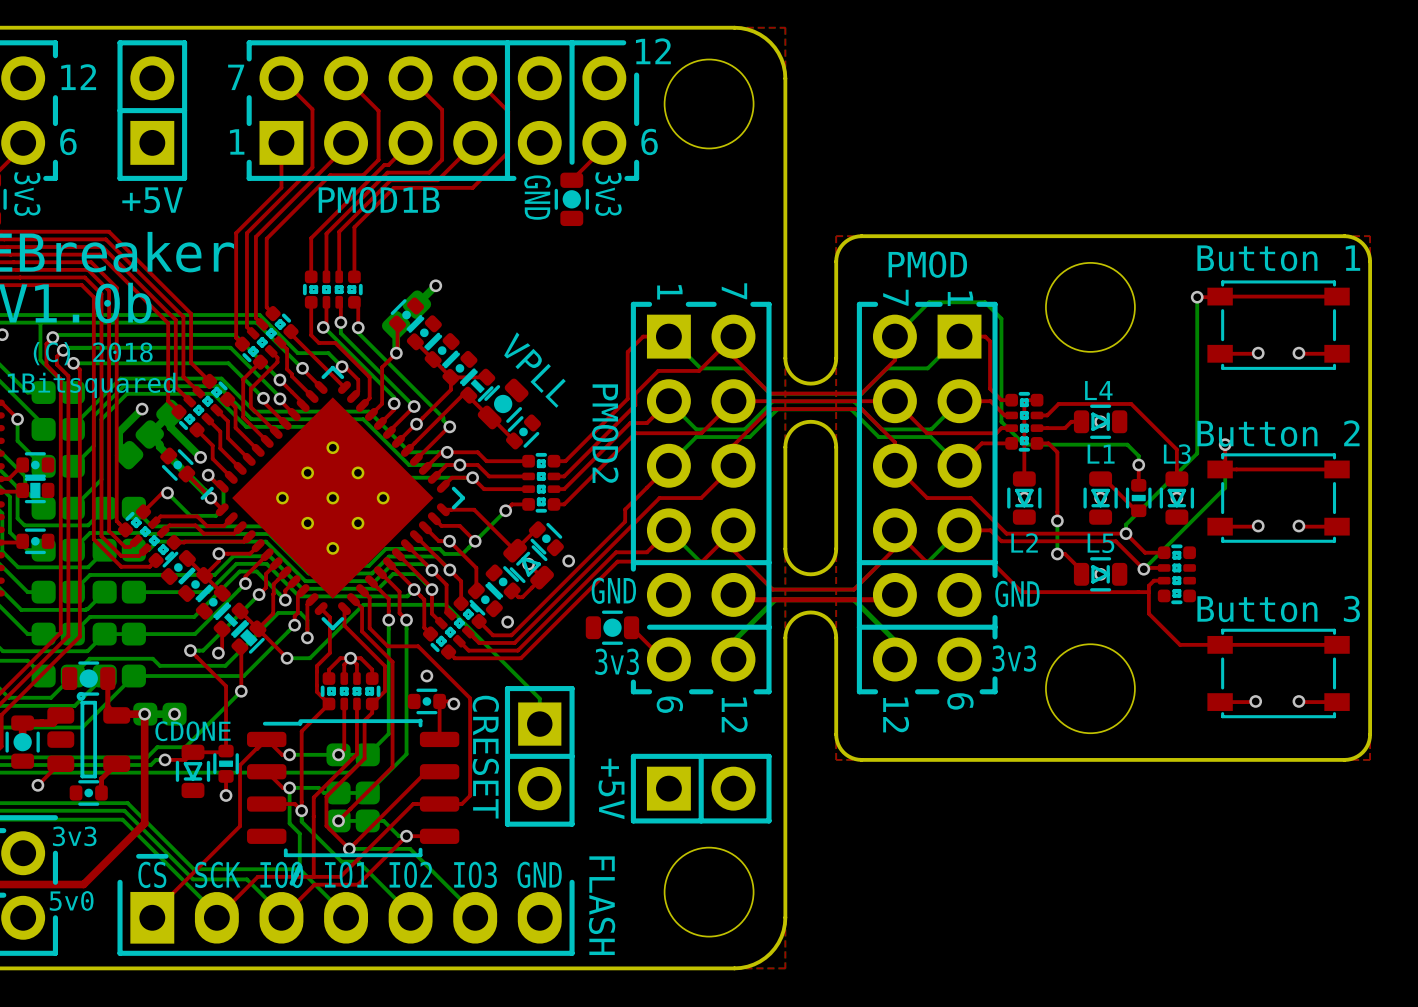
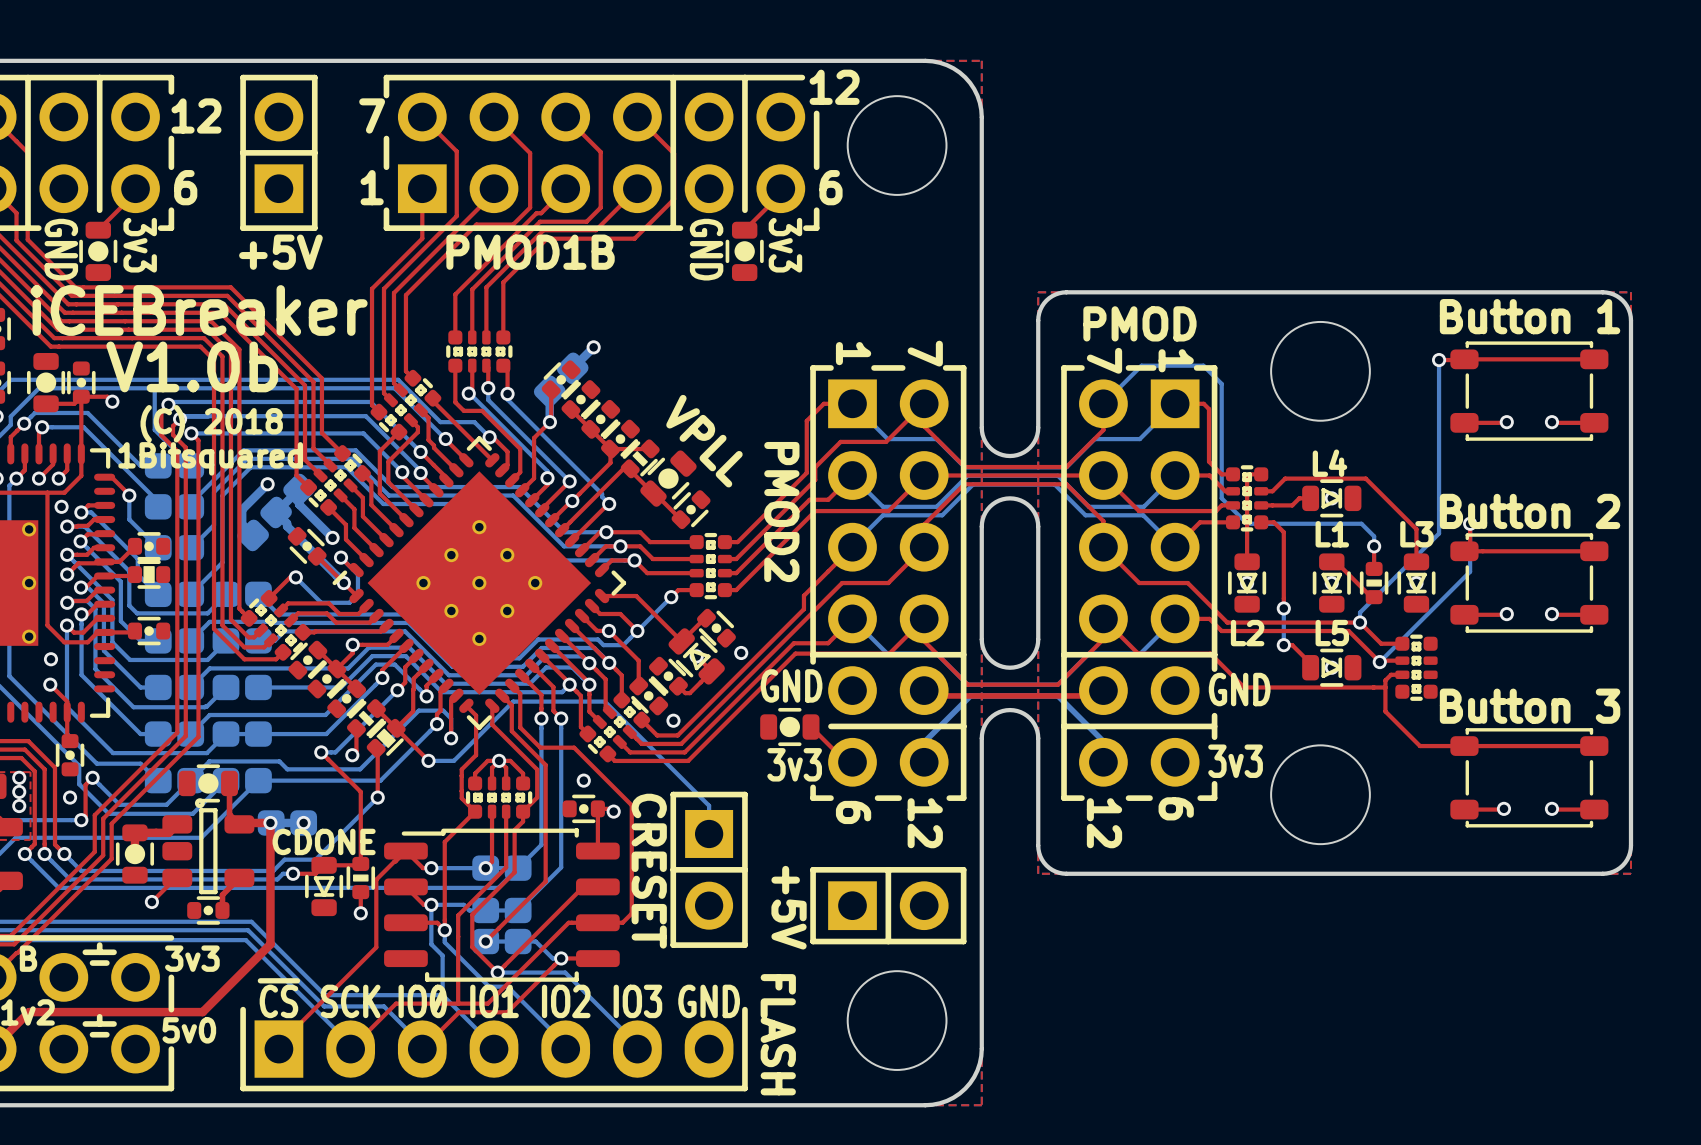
part footprint: [1207, 280, 1350, 370] -> [1450, 341, 1609, 441]
part footprint: [1207, 453, 1350, 543] -> [1450, 533, 1609, 633]
part footprint: [1207, 628, 1350, 719] -> [1450, 728, 1609, 828]

